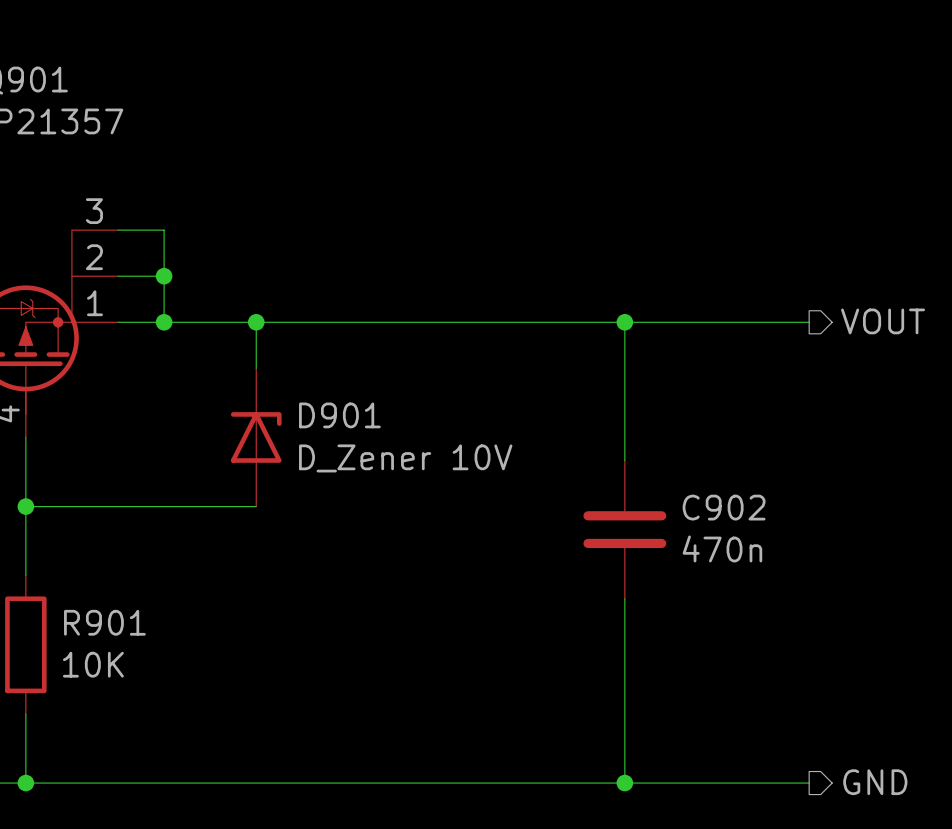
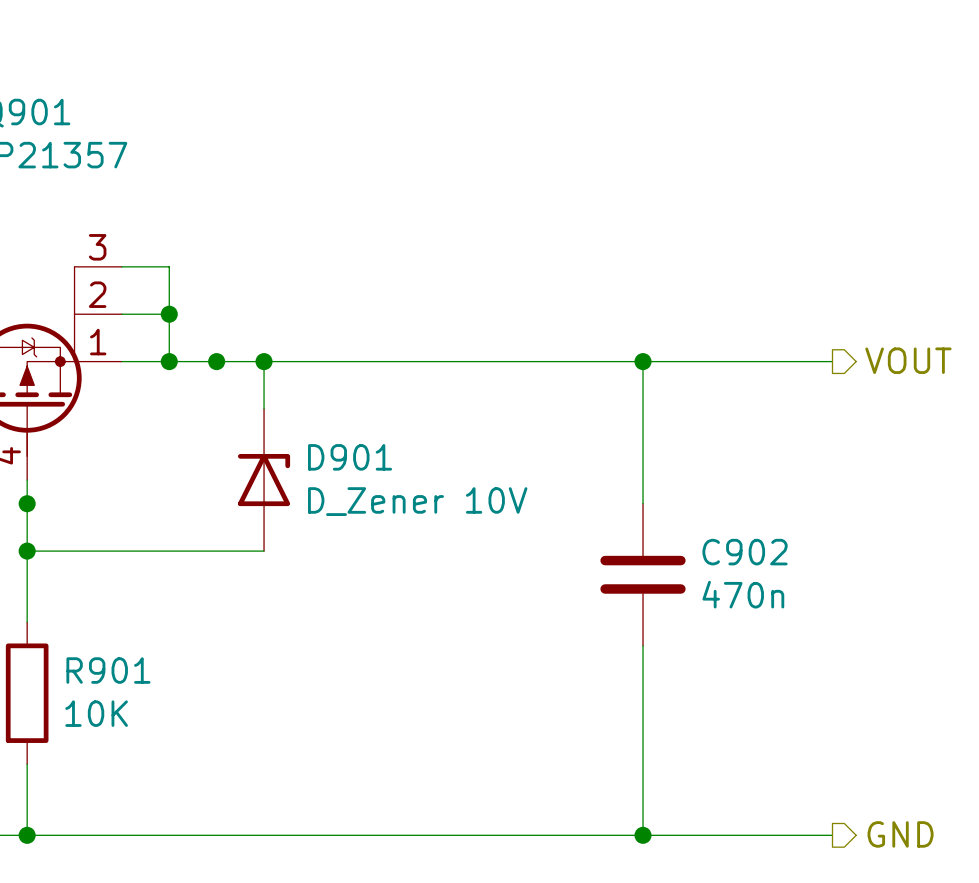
junction: none -> (216, 361)
junction: none -> (27, 503)

